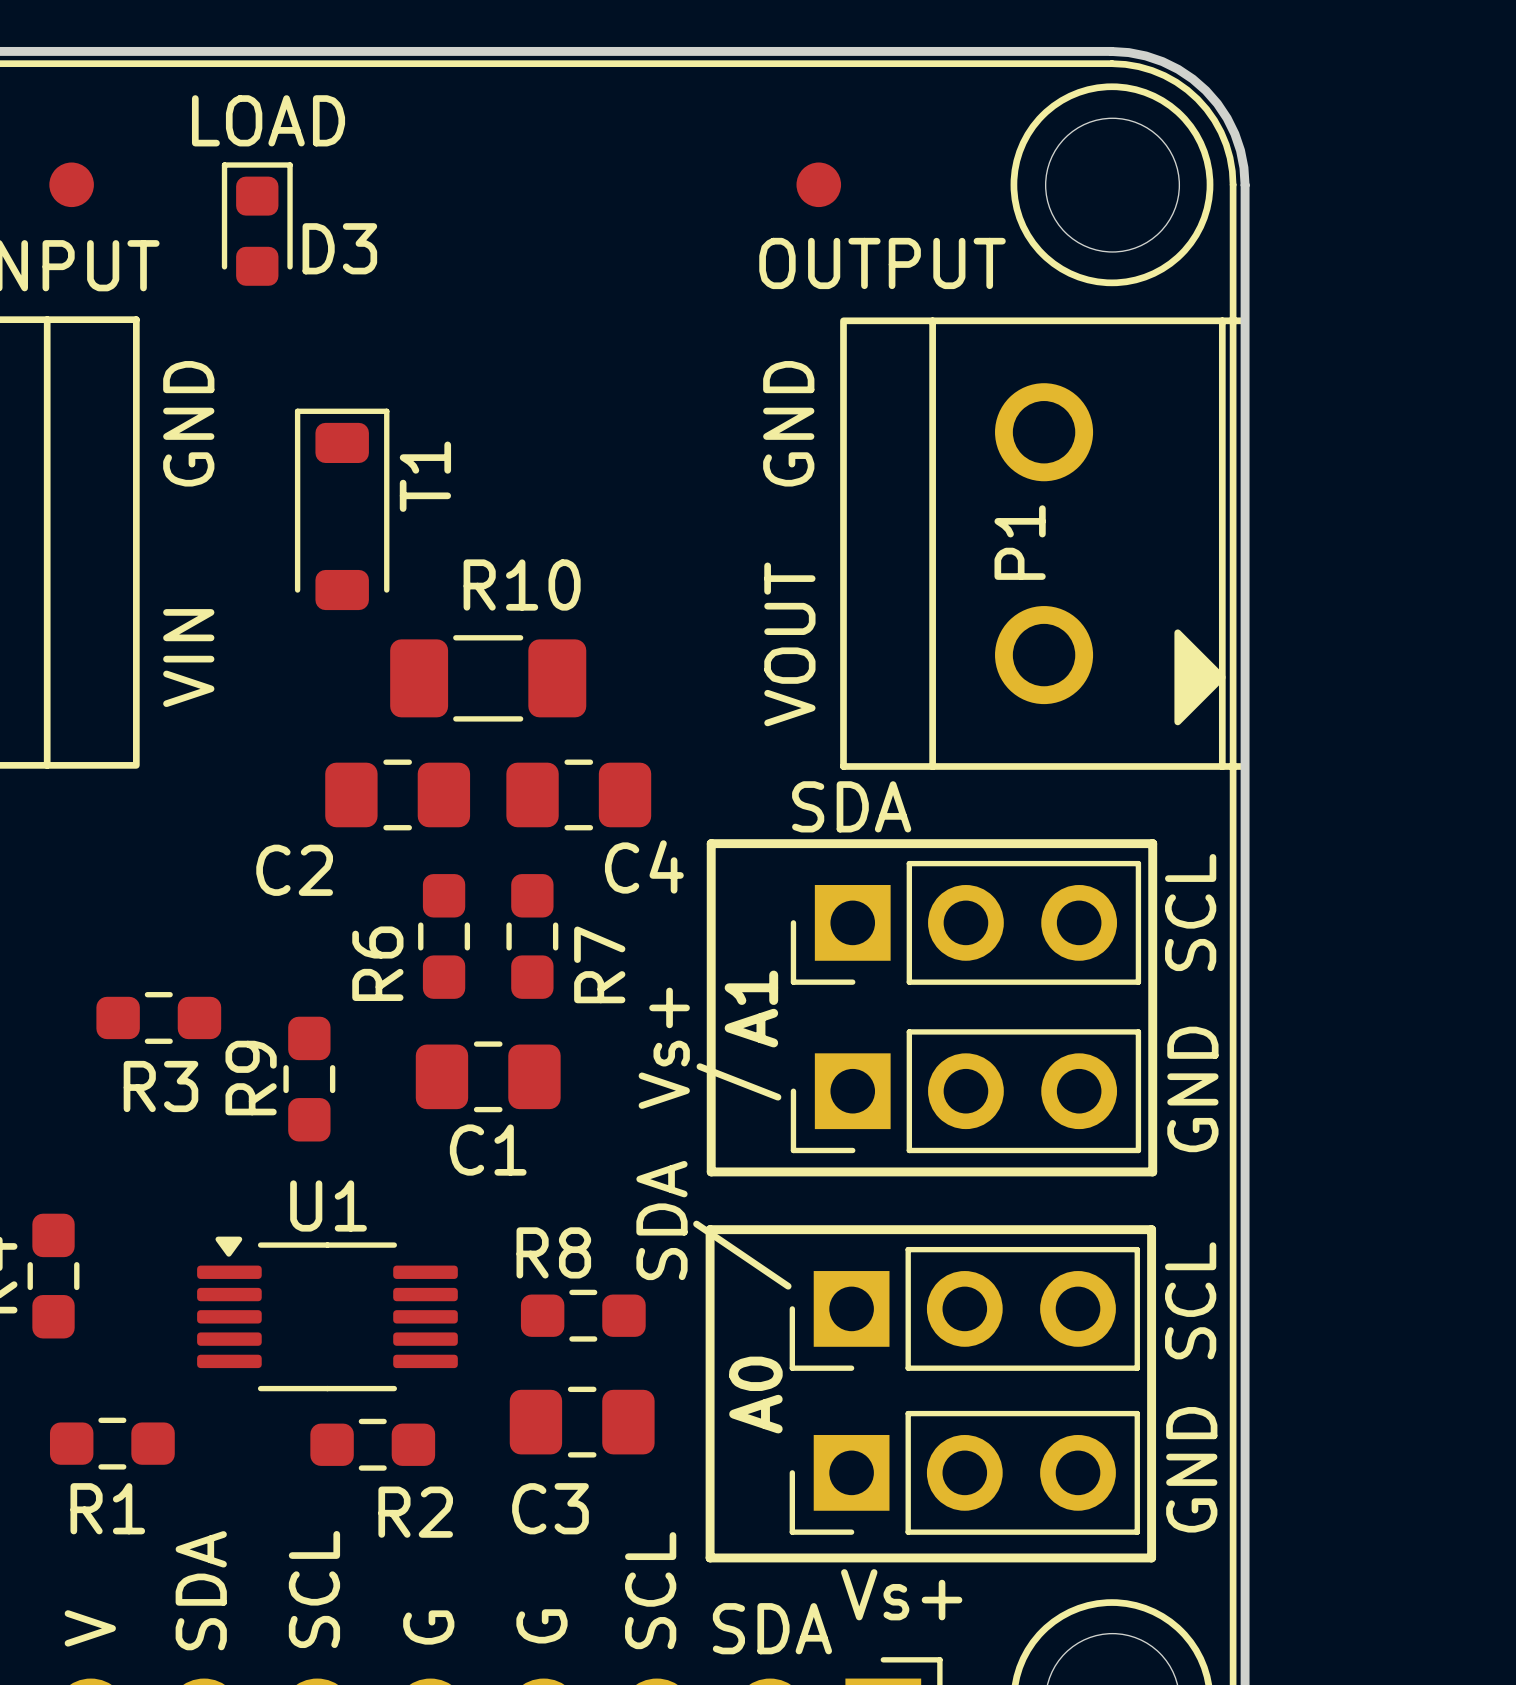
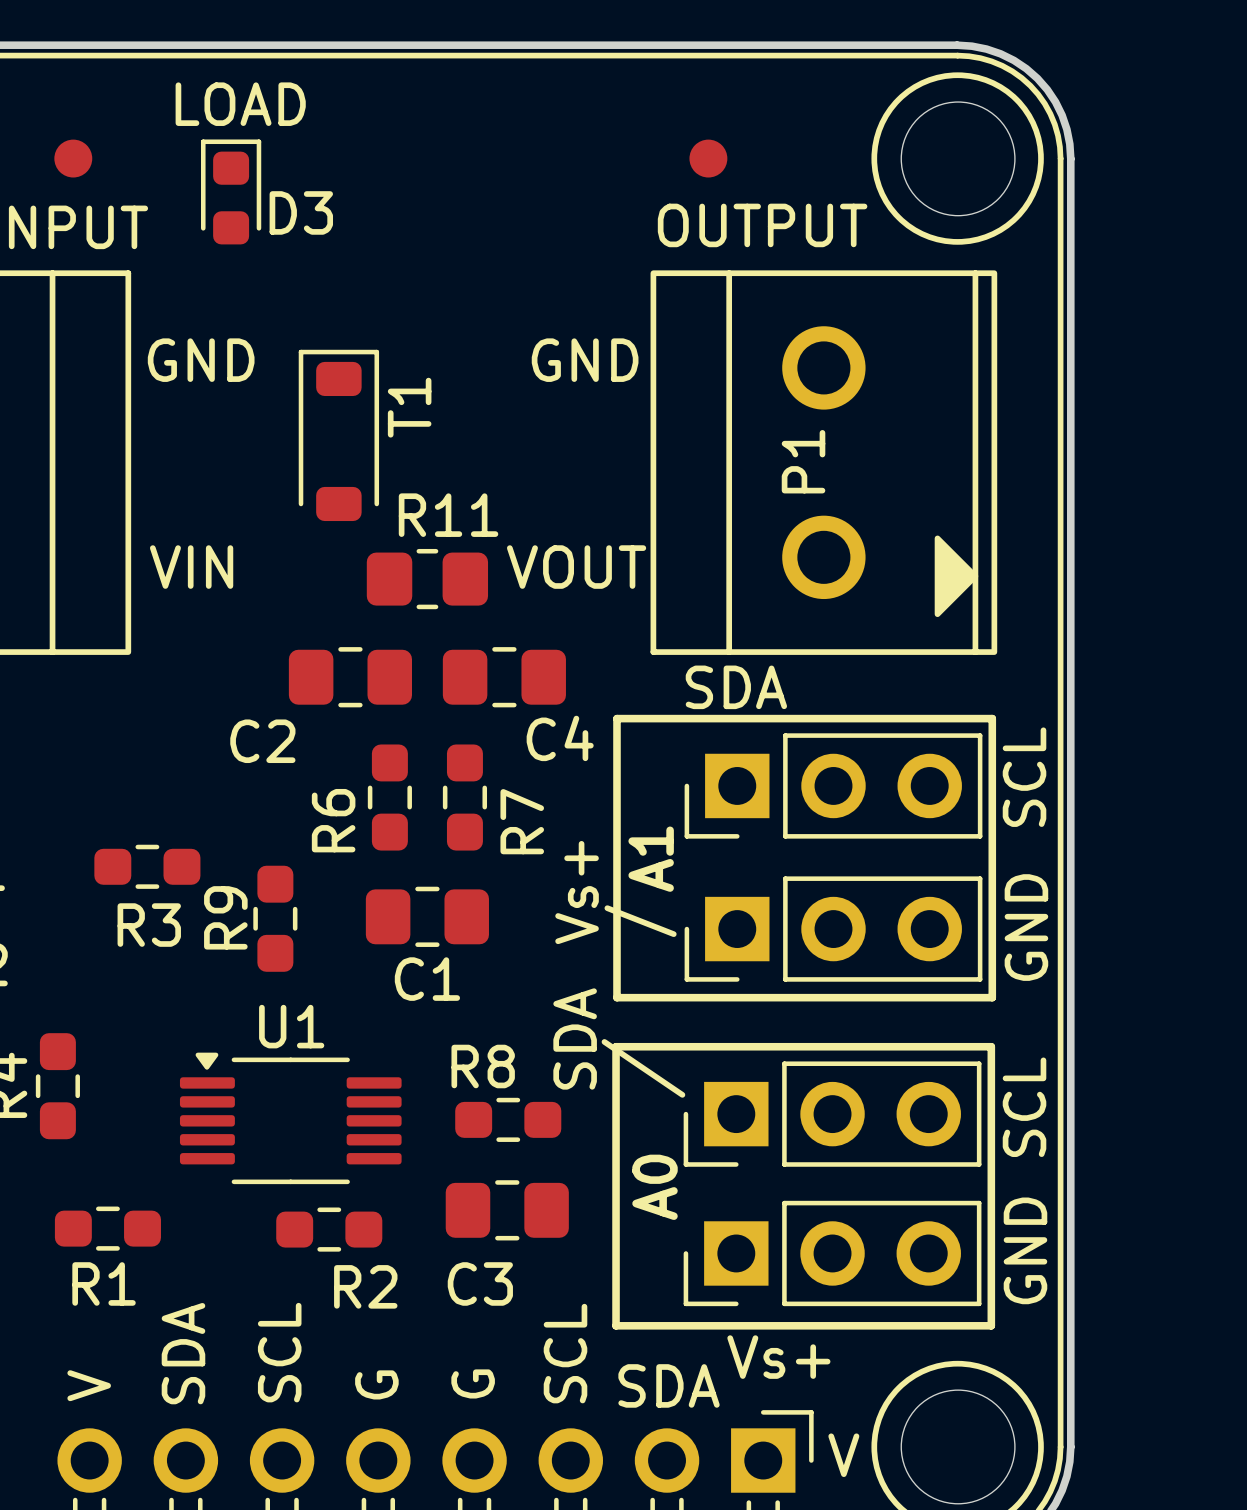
text rotation: 0° (188, 423) -> 90° clockwise (201, 360)
text rotation: 0° (788, 423) -> 90° clockwise (585, 360)
T1 position: (342, 509) -> (338, 435)
P1 position: (1044, 543) -> (823, 462)
text rotation: 0° (789, 644) -> 90° clockwise (576, 567)
text rotation: 0° (188, 658) -> 90° clockwise (191, 567)
R10: (488, 678) -> none
R11: none -> (427, 579)

